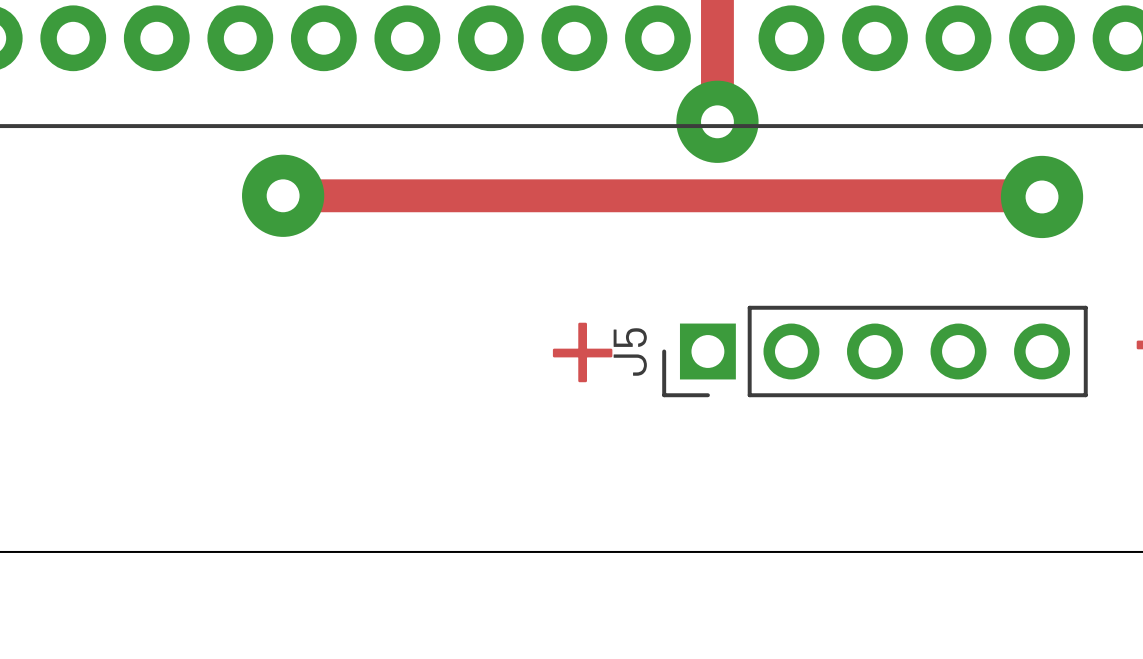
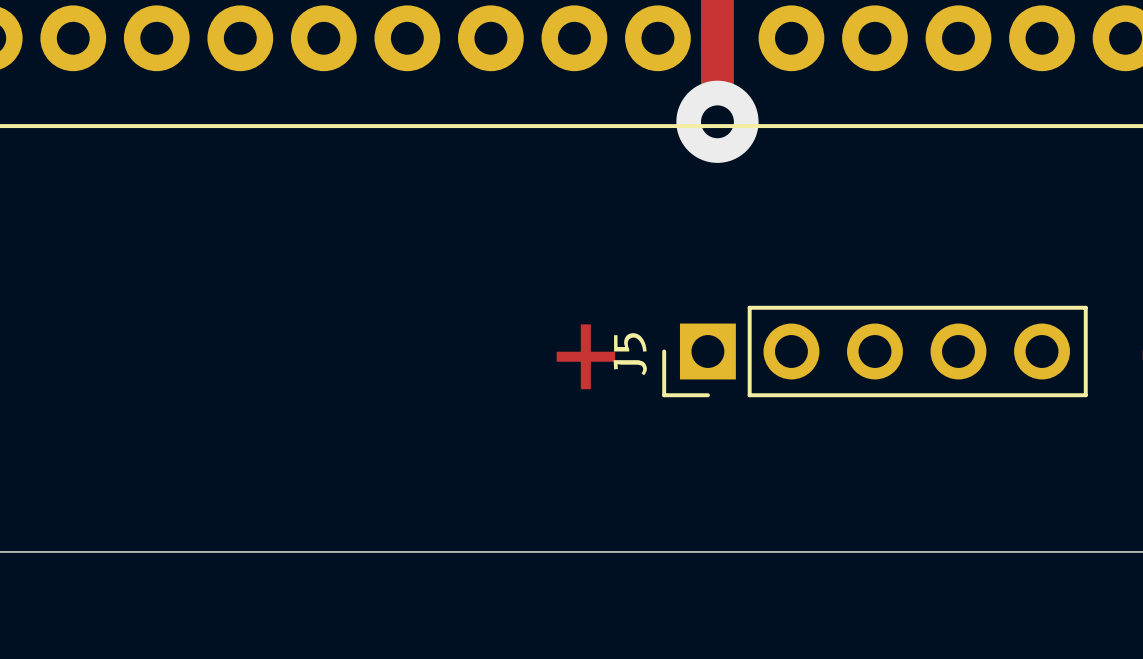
track: (277, 195) (1042, 196) -> none
via: (283, 195) -> none
via: (1042, 196) -> none

